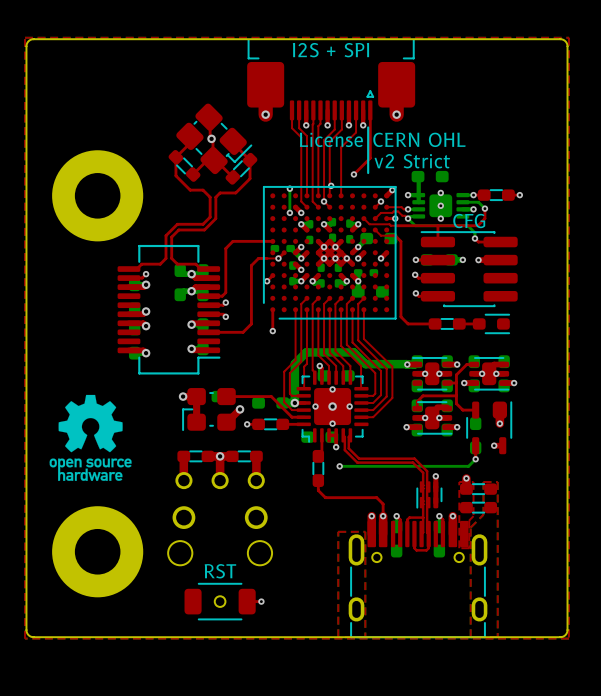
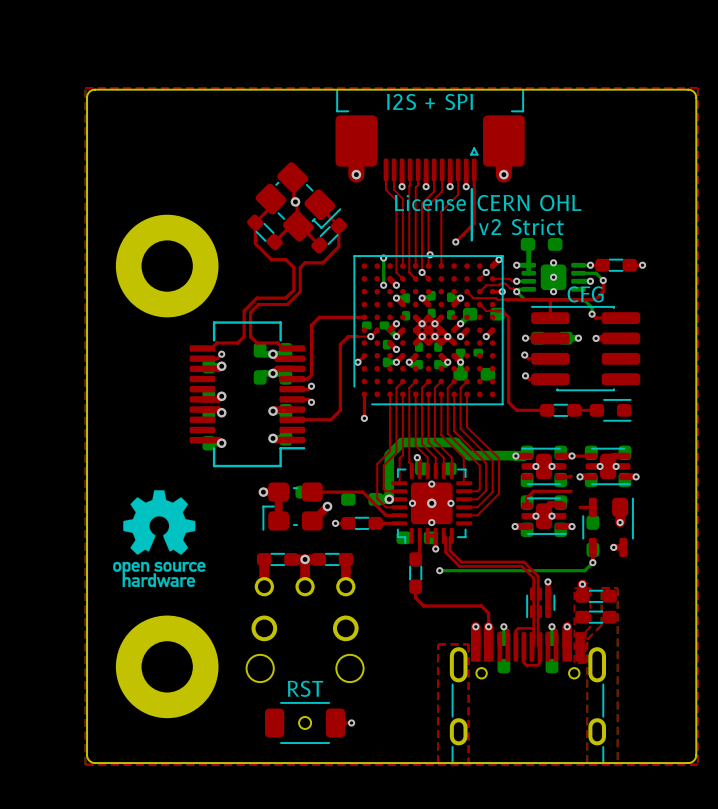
top track: (466, 364) (456, 374) (456, 403) (464, 410) -> (582, 456) (572, 456)

